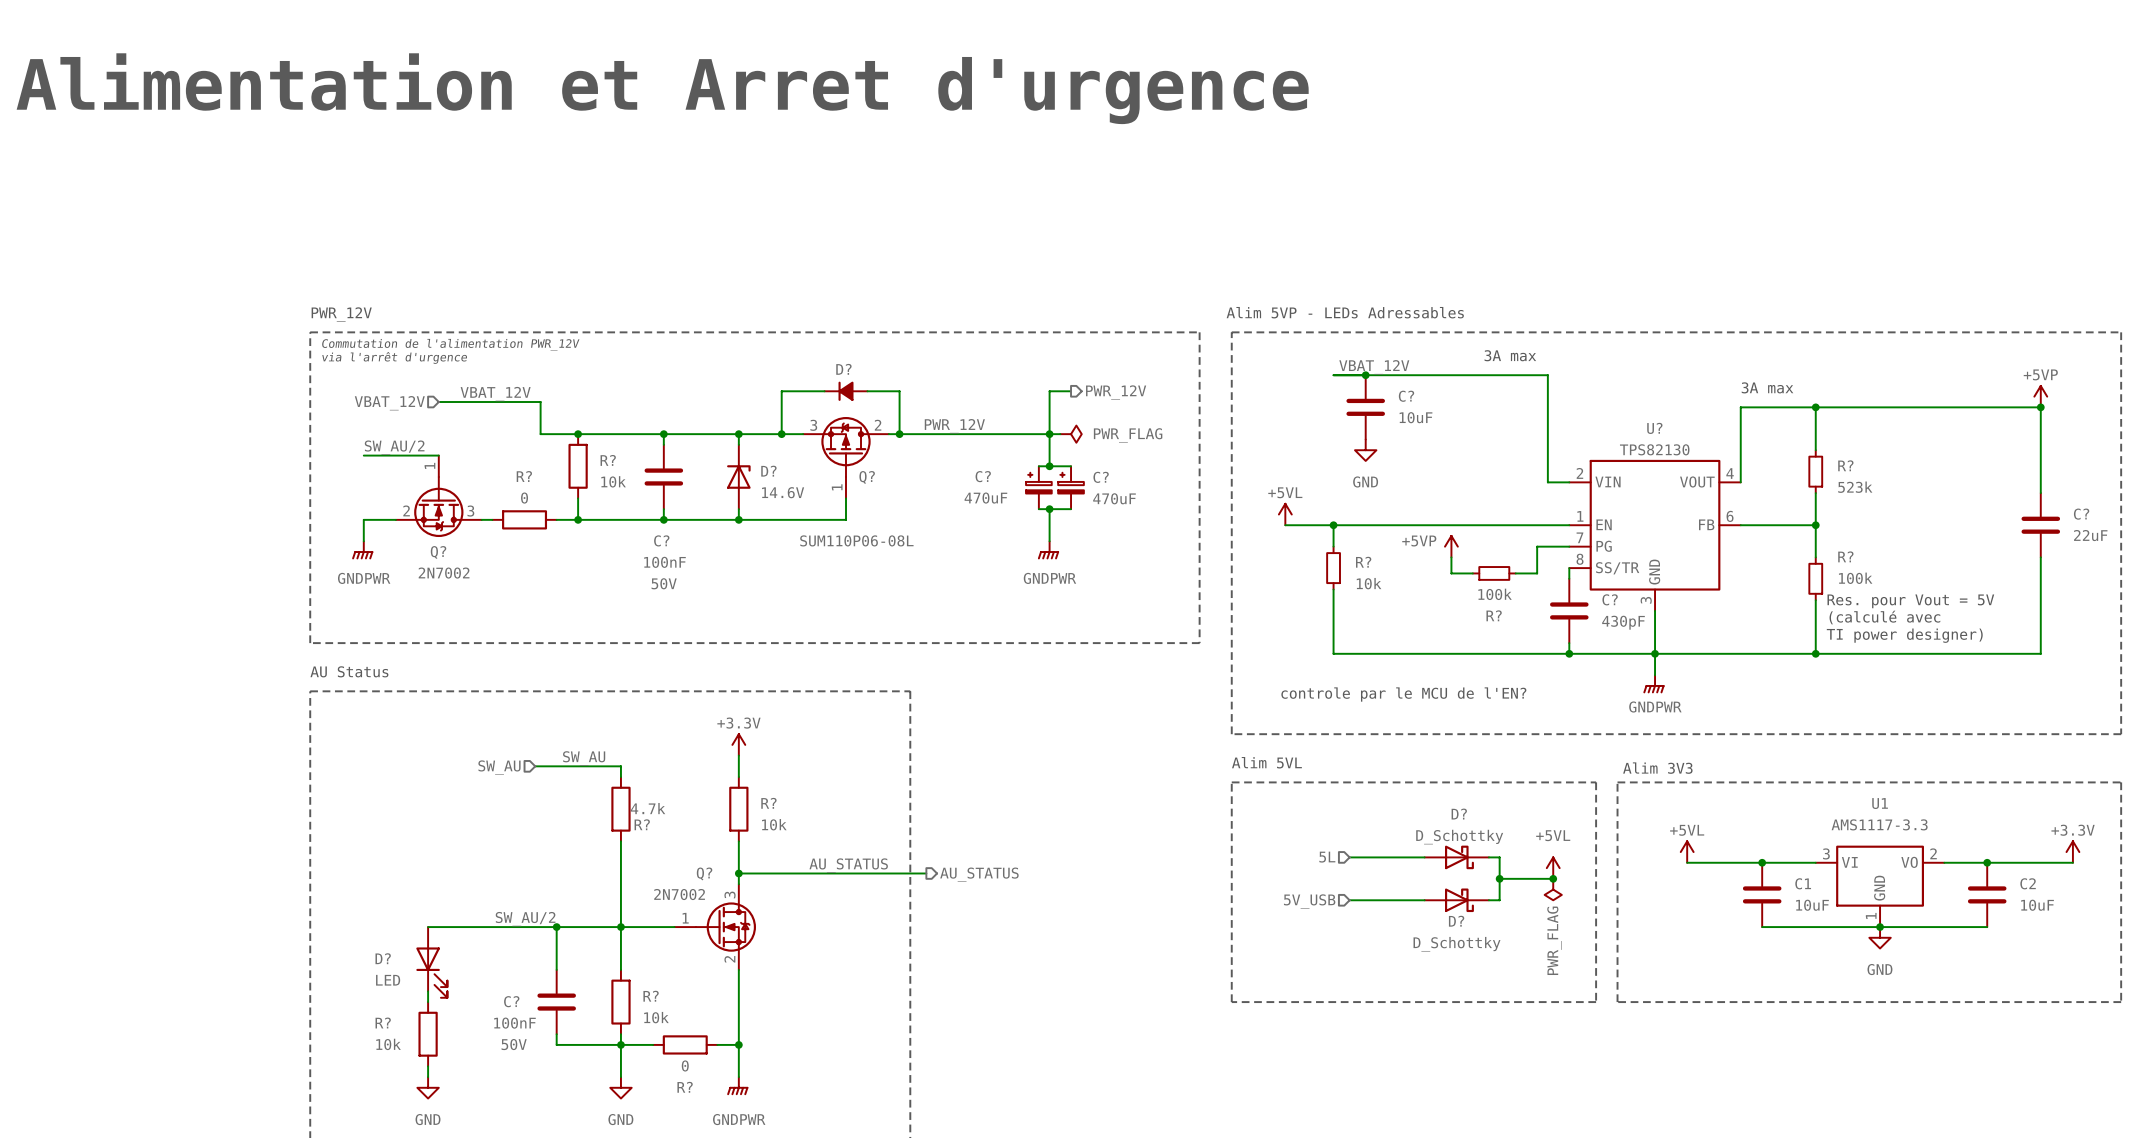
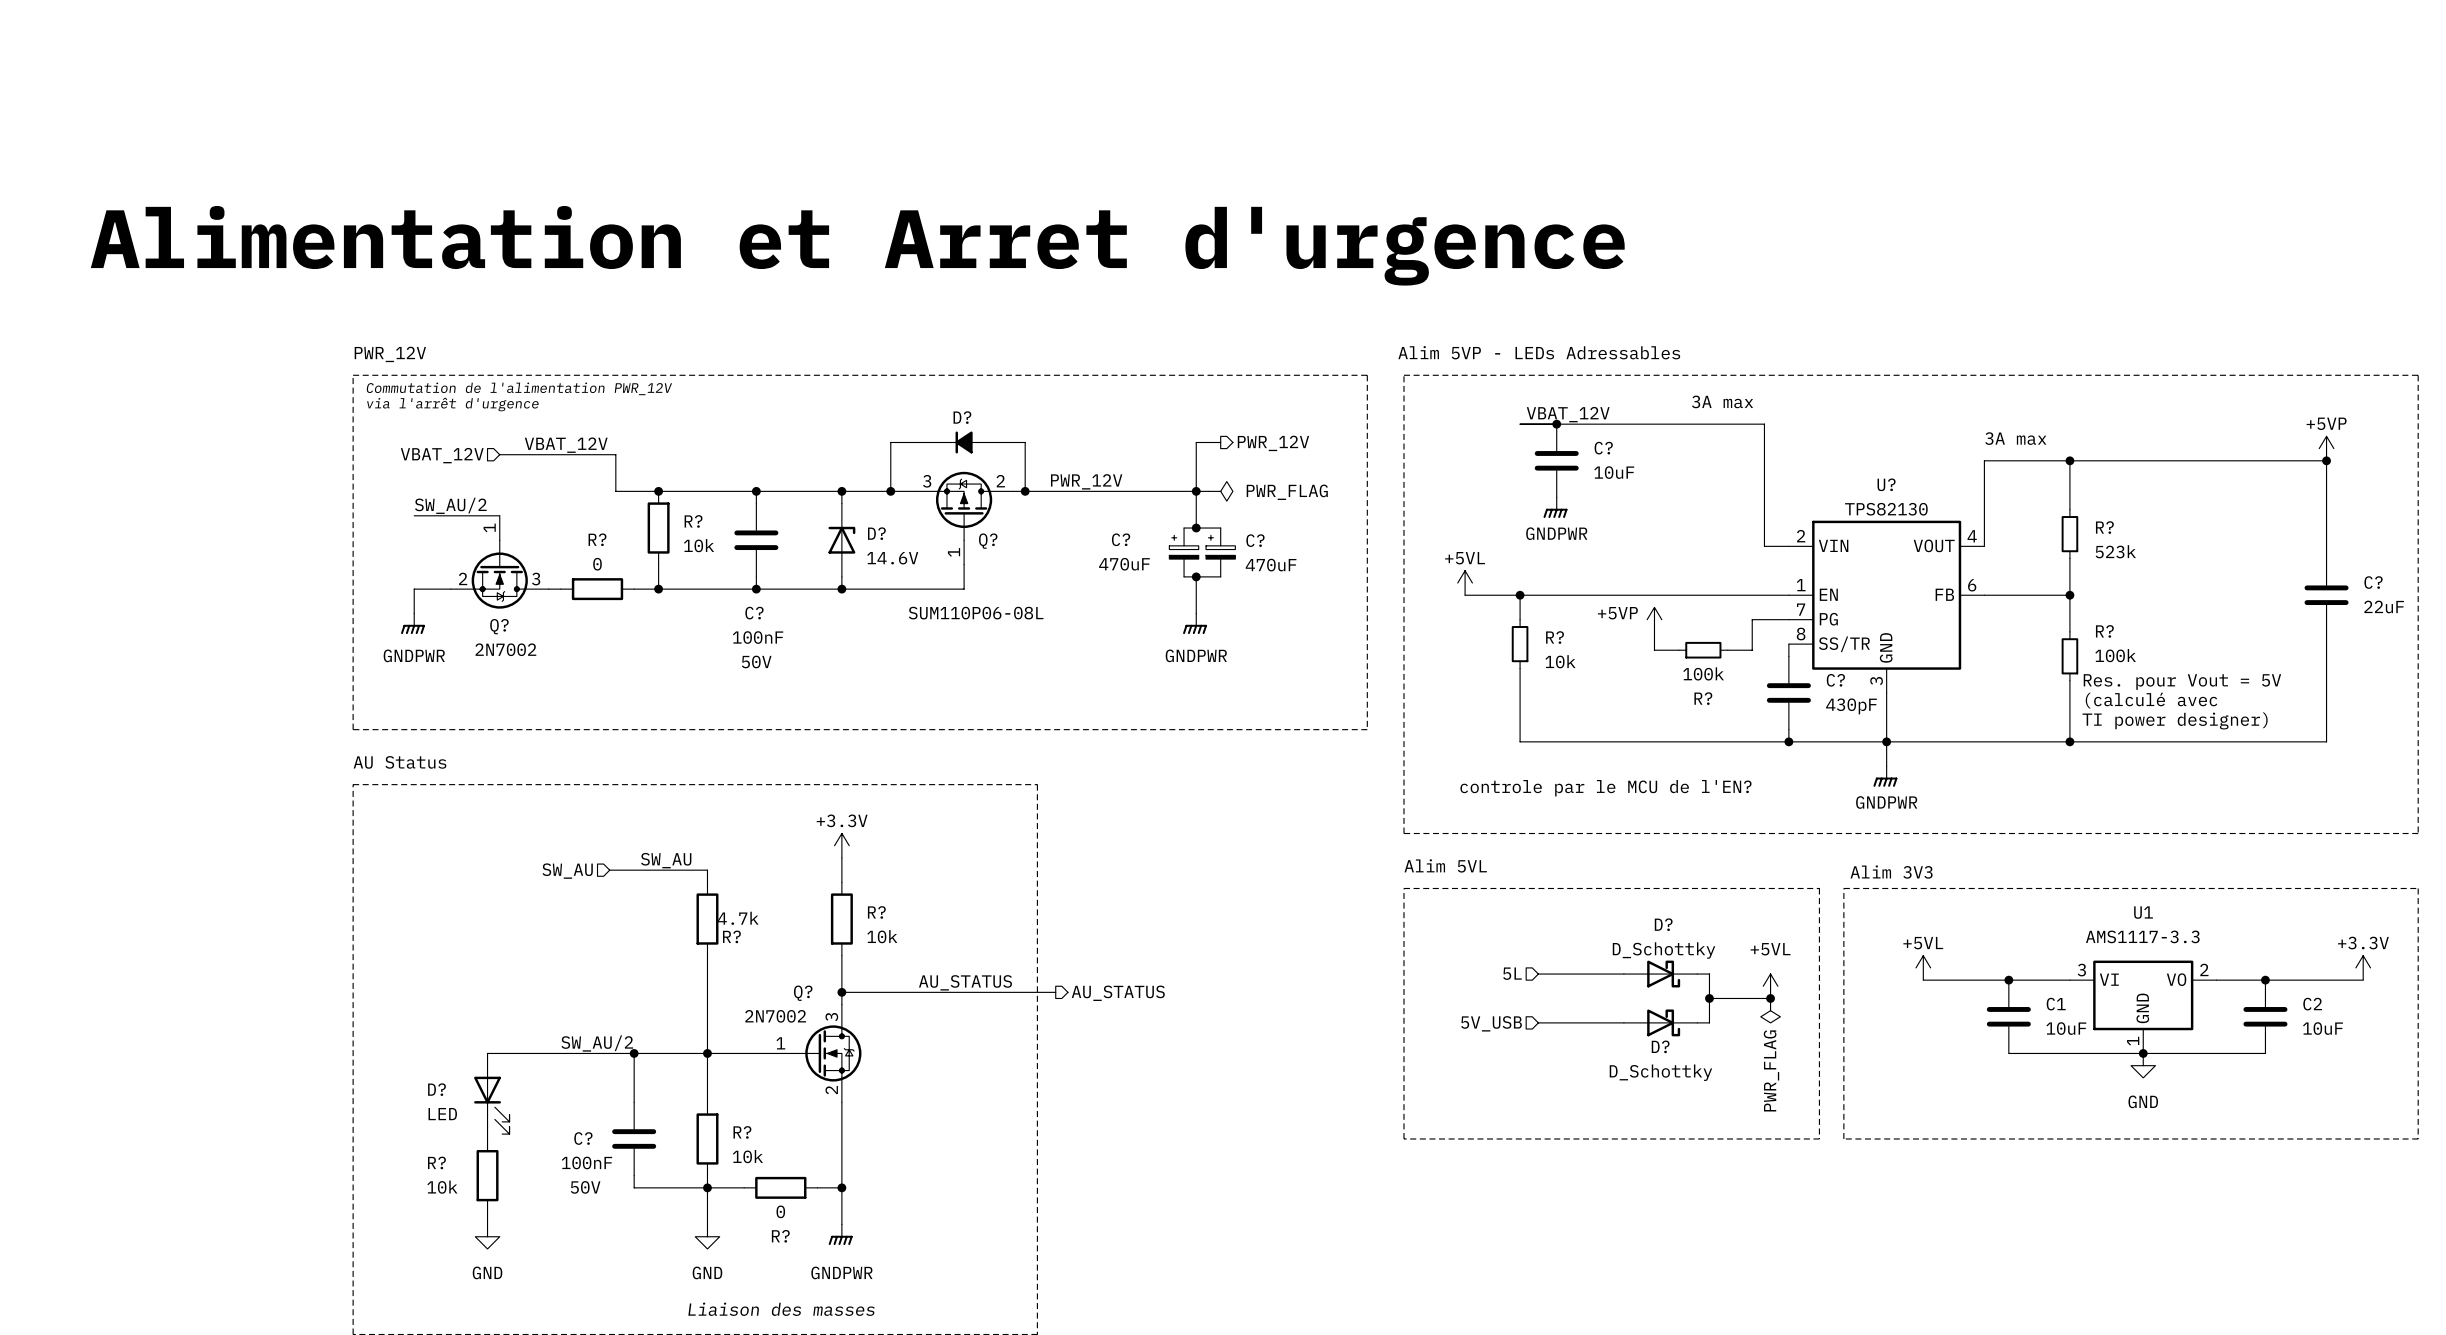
text position: Alimentation et Arret d'urgence (662, 88) -> Alimentation et Arret d'urgence (857, 245)
power symbol: GND (1365, 450) -> GNDPWR (1555, 507)

